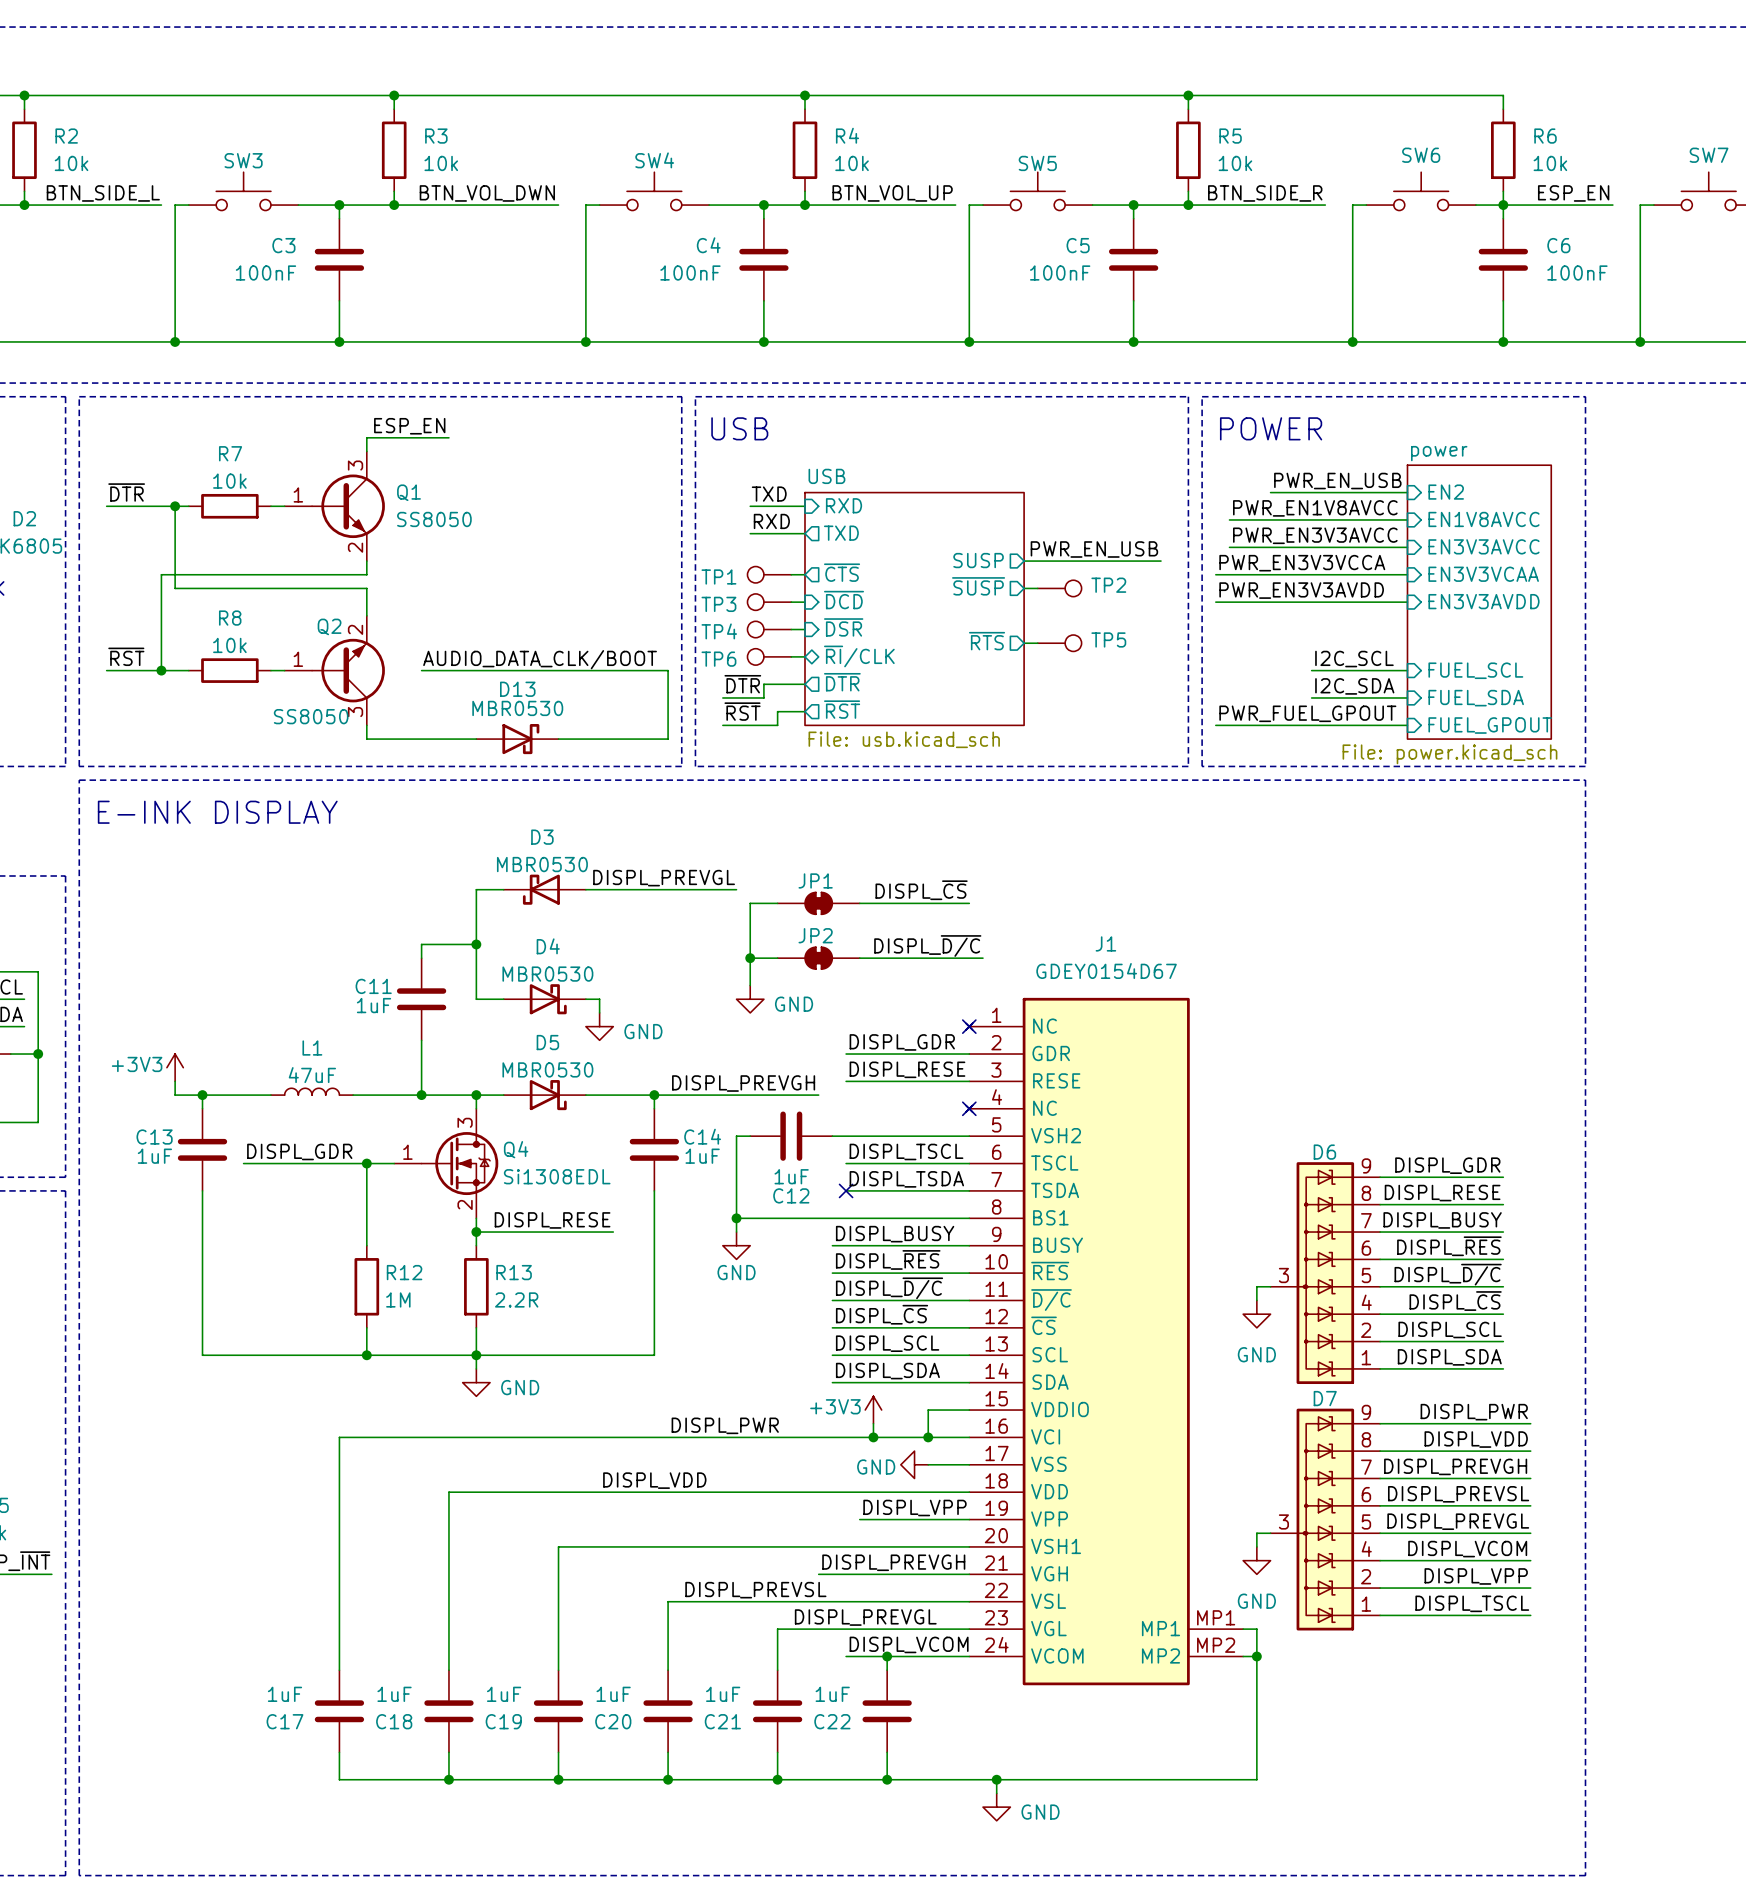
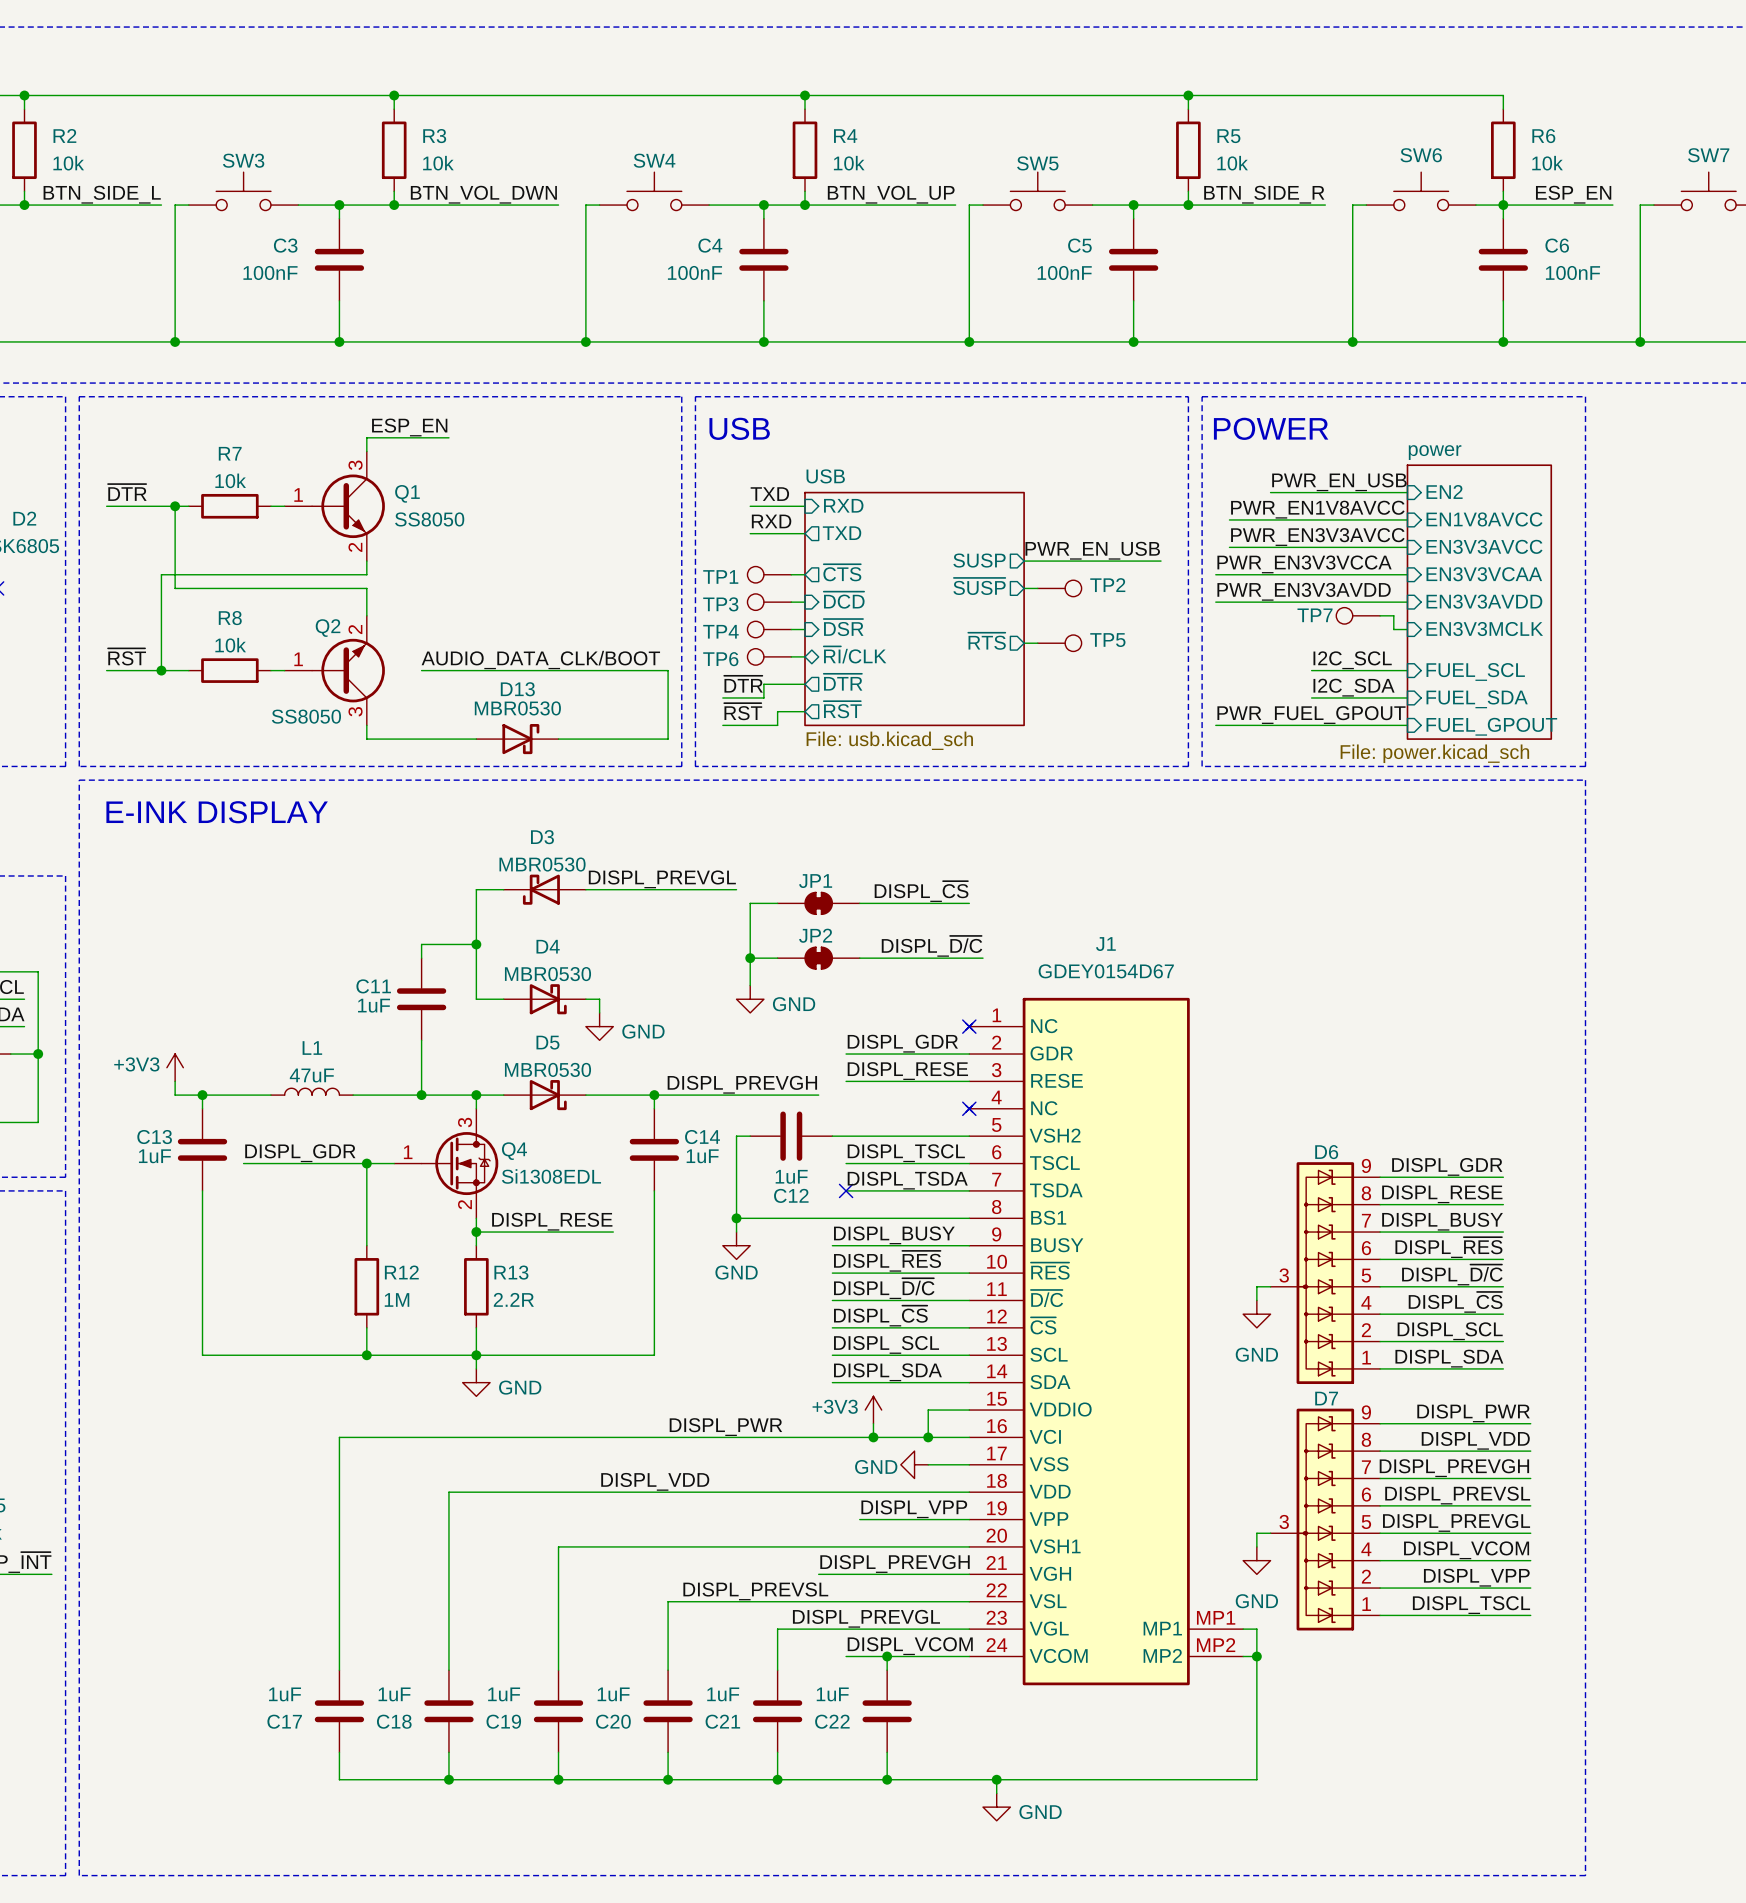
TP7: none -> (1358, 615)
wire: none -> (1380, 615) (1393, 615) (1393, 629) (1407, 629)
sheet pin: none -> EN3V3MCLK (1484, 629)

